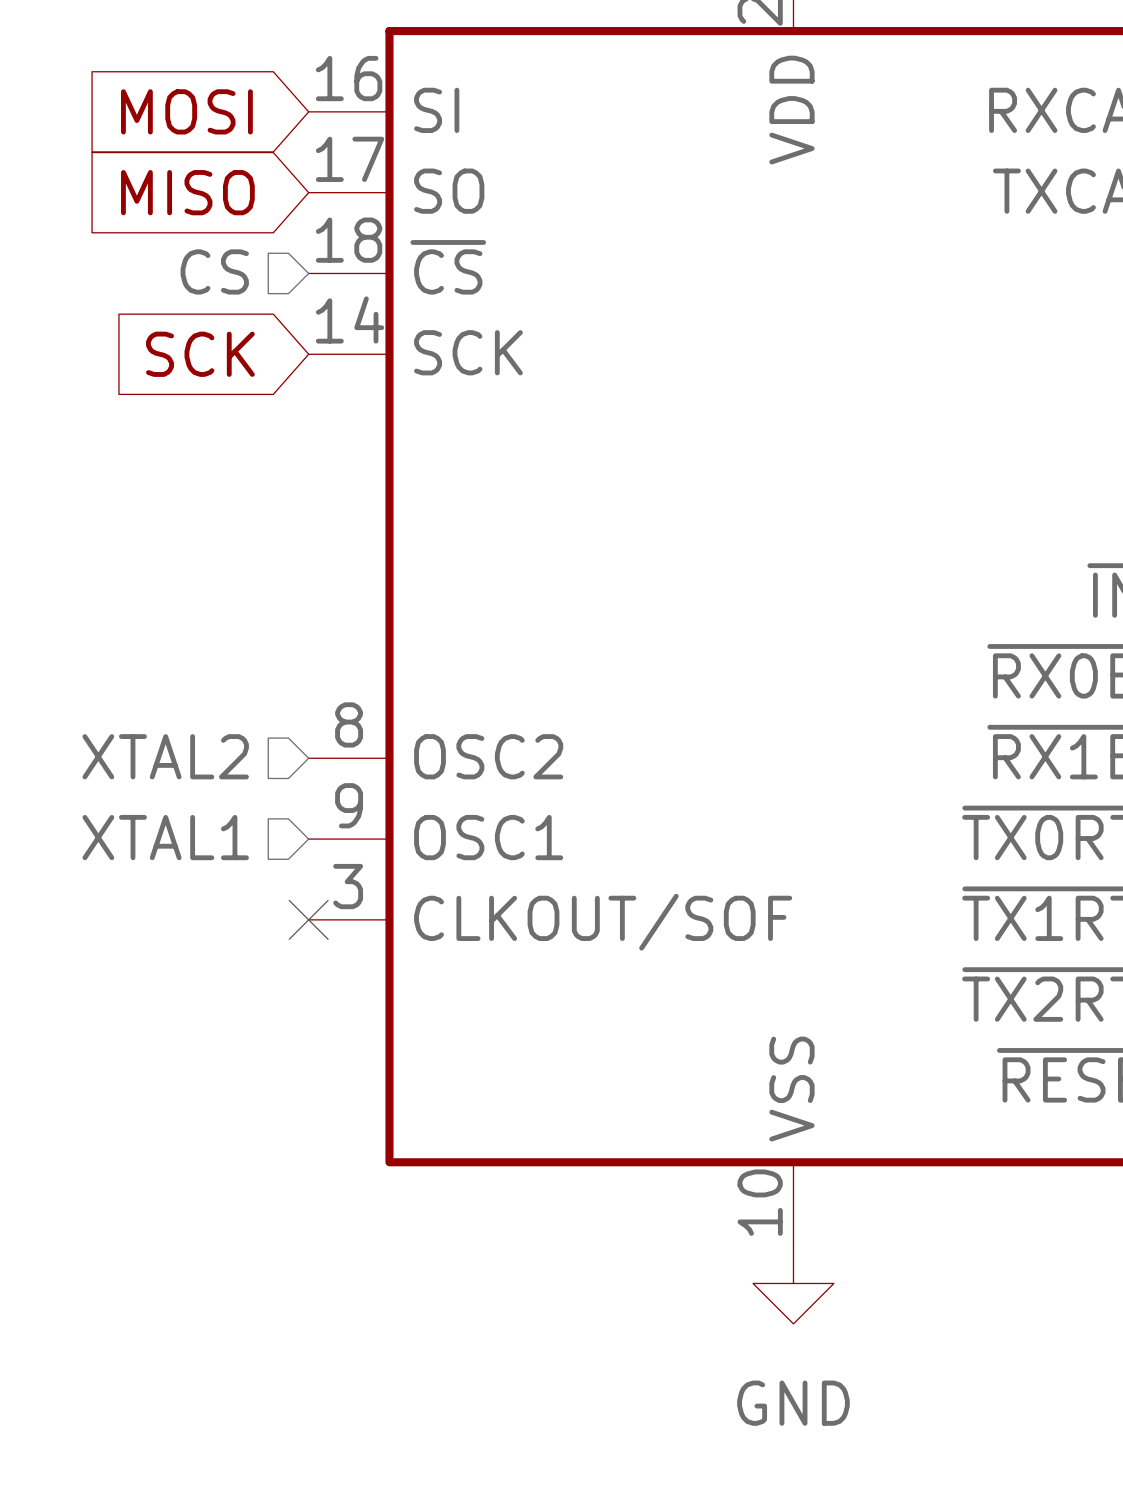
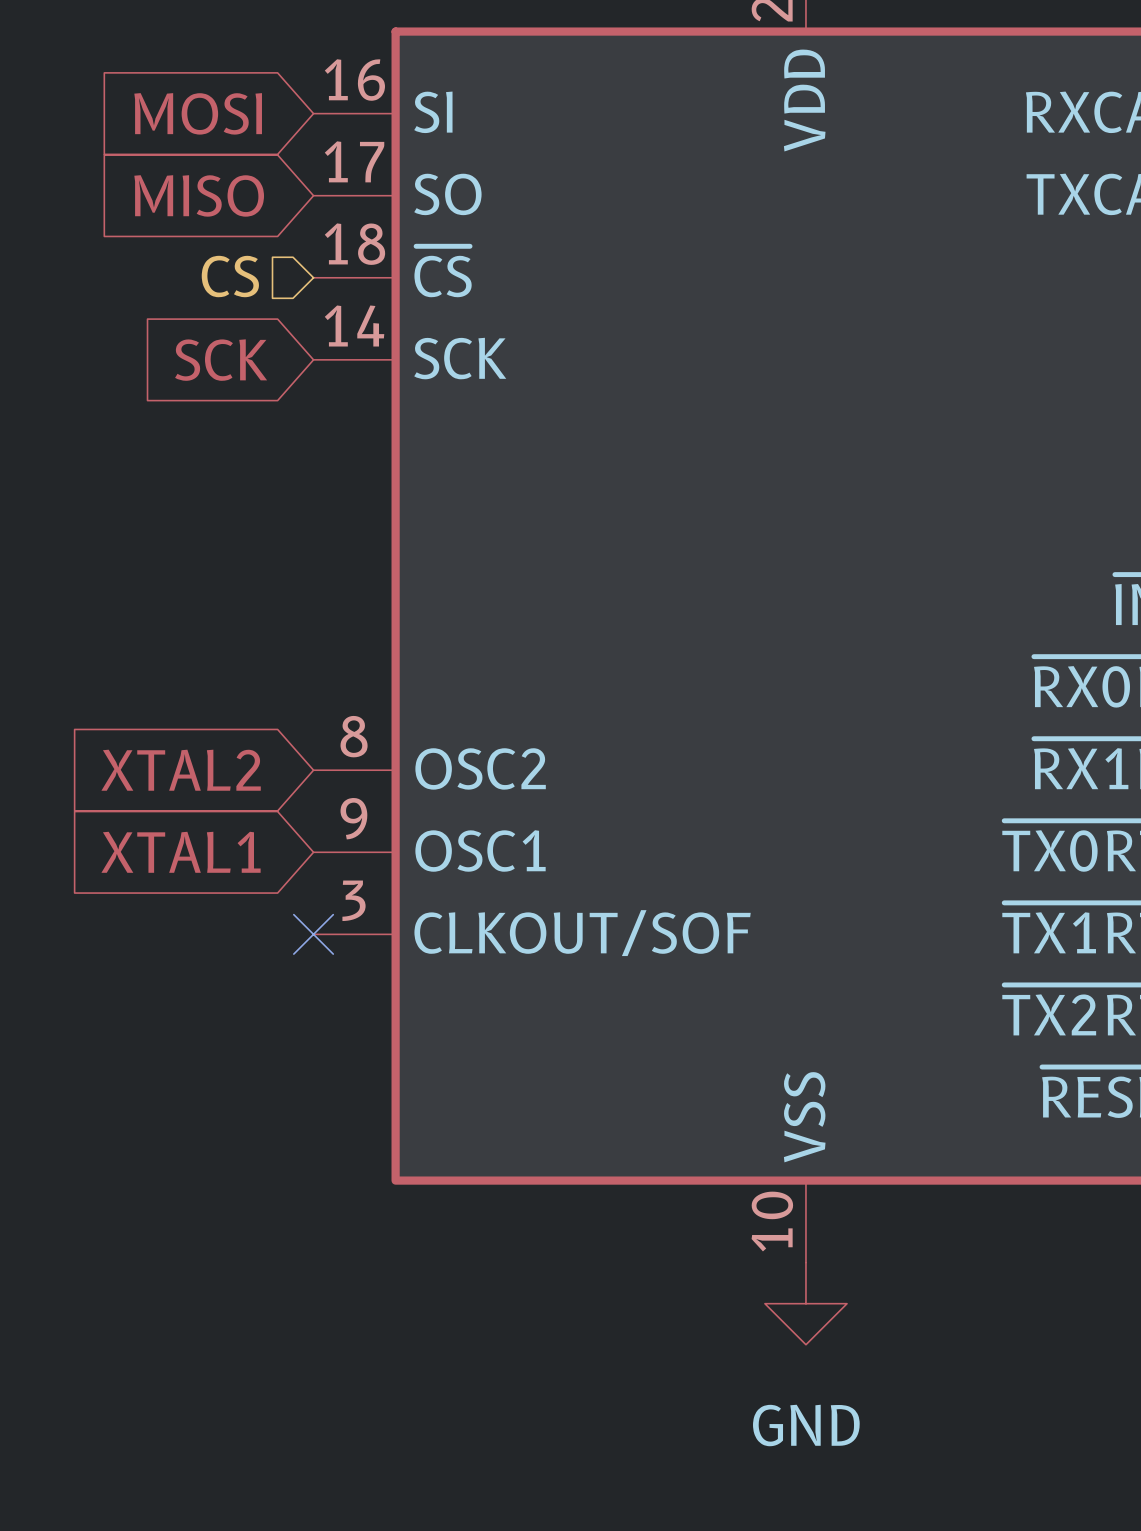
hierarchical label: XTAL2 (165, 756) -> none
global label: none -> XTAL2 (181, 770)
hierarchical label: XTAL1 (165, 837) -> none
global label: none -> XTAL1 (181, 852)

